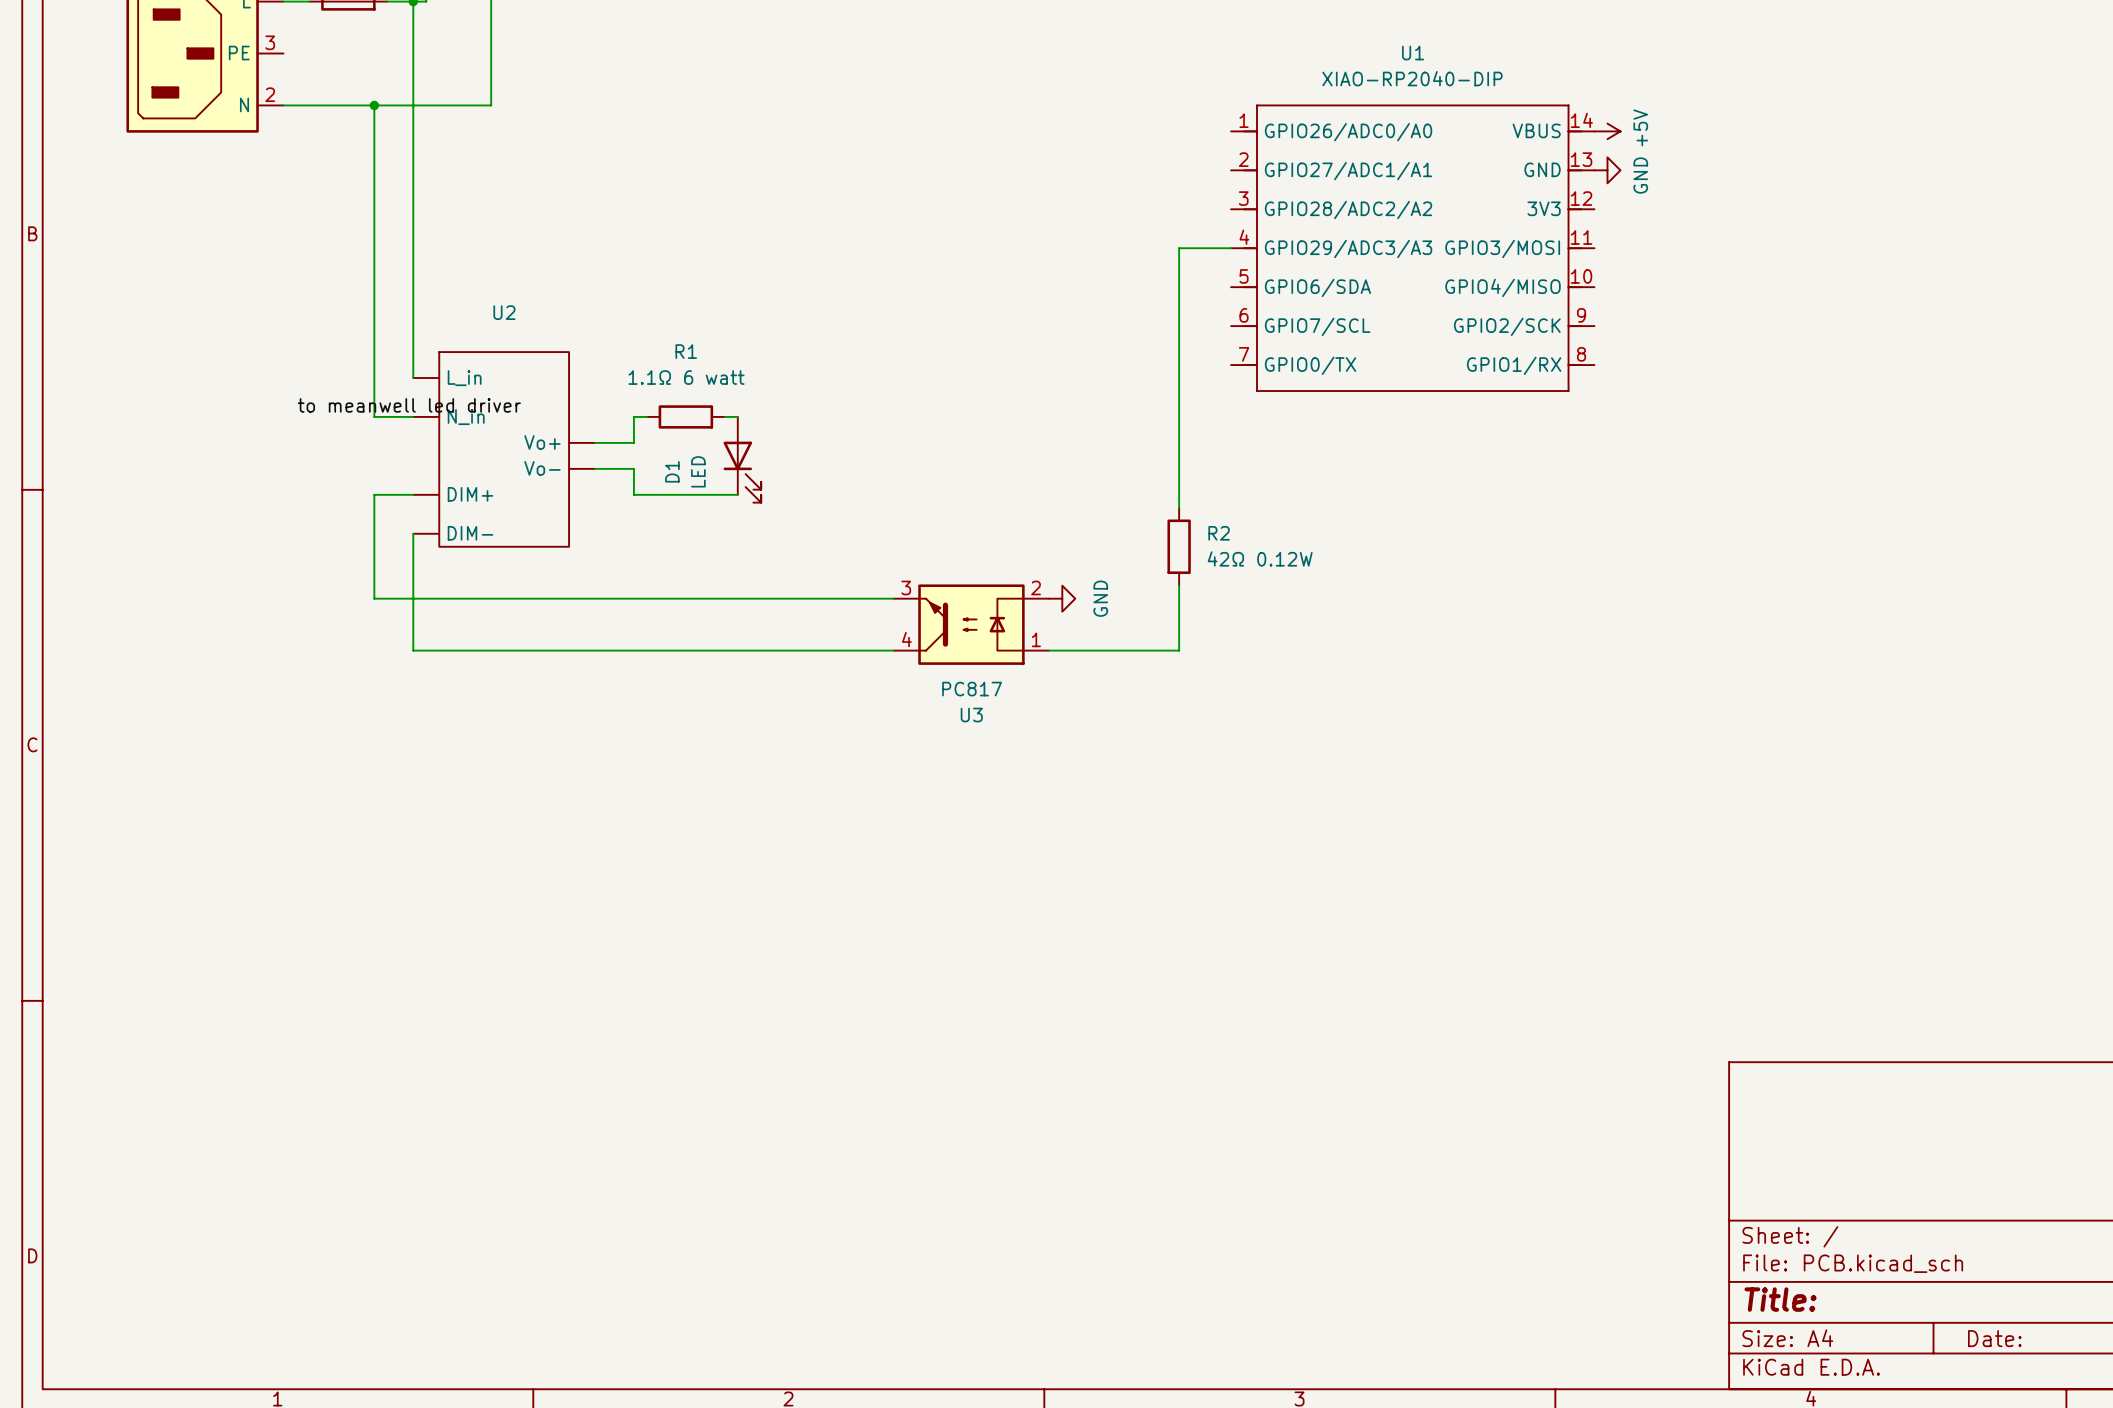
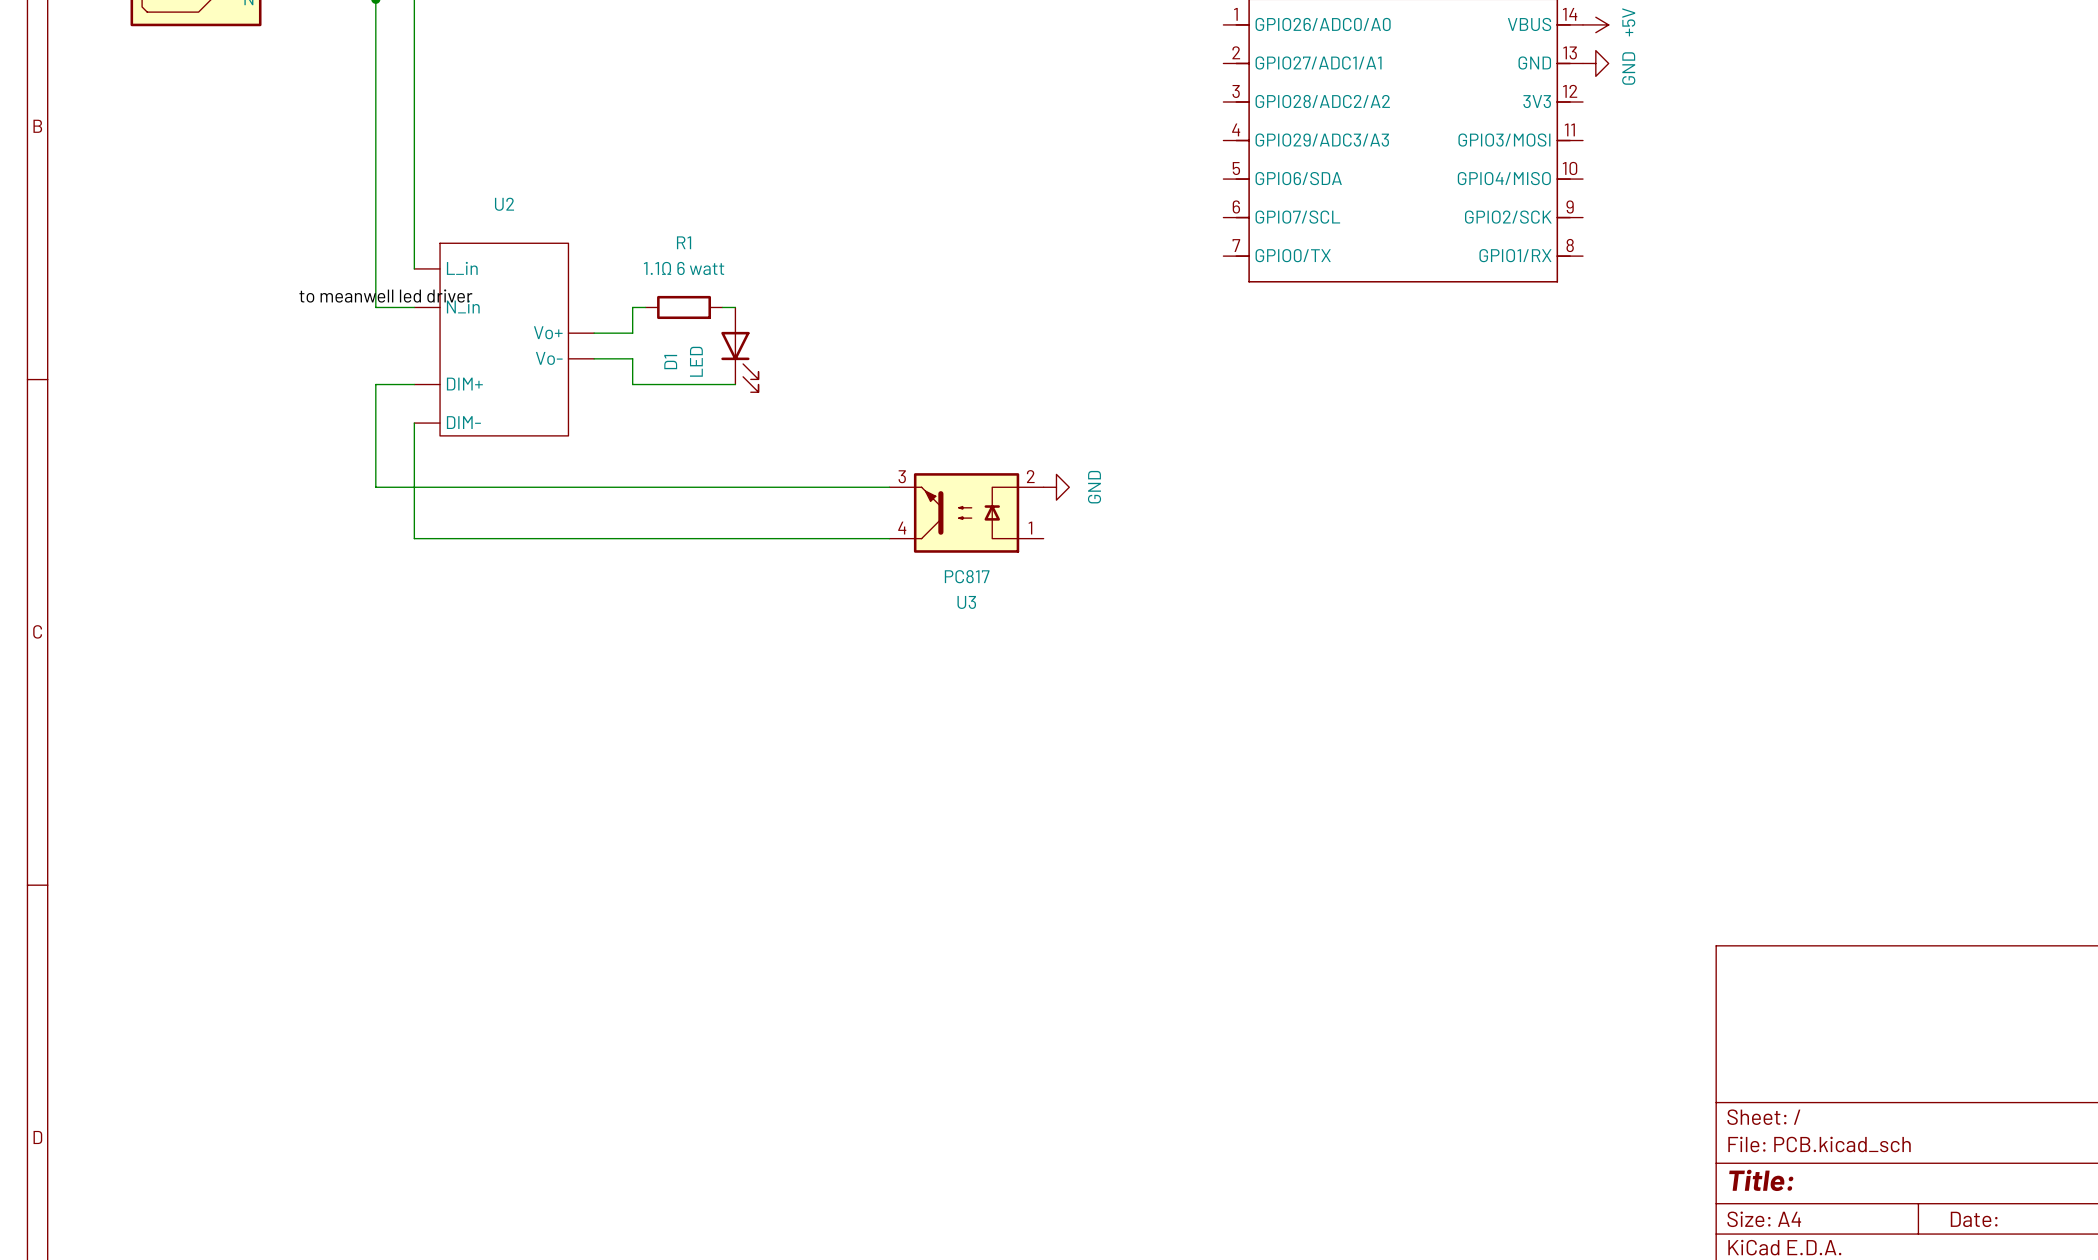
wire: (1231, 248) (1179, 248) (1179, 507) -> none
R2: 42Ω 0.12W (1179, 546) -> none
wire: (1179, 585) (1179, 650) (1049, 650) -> none

